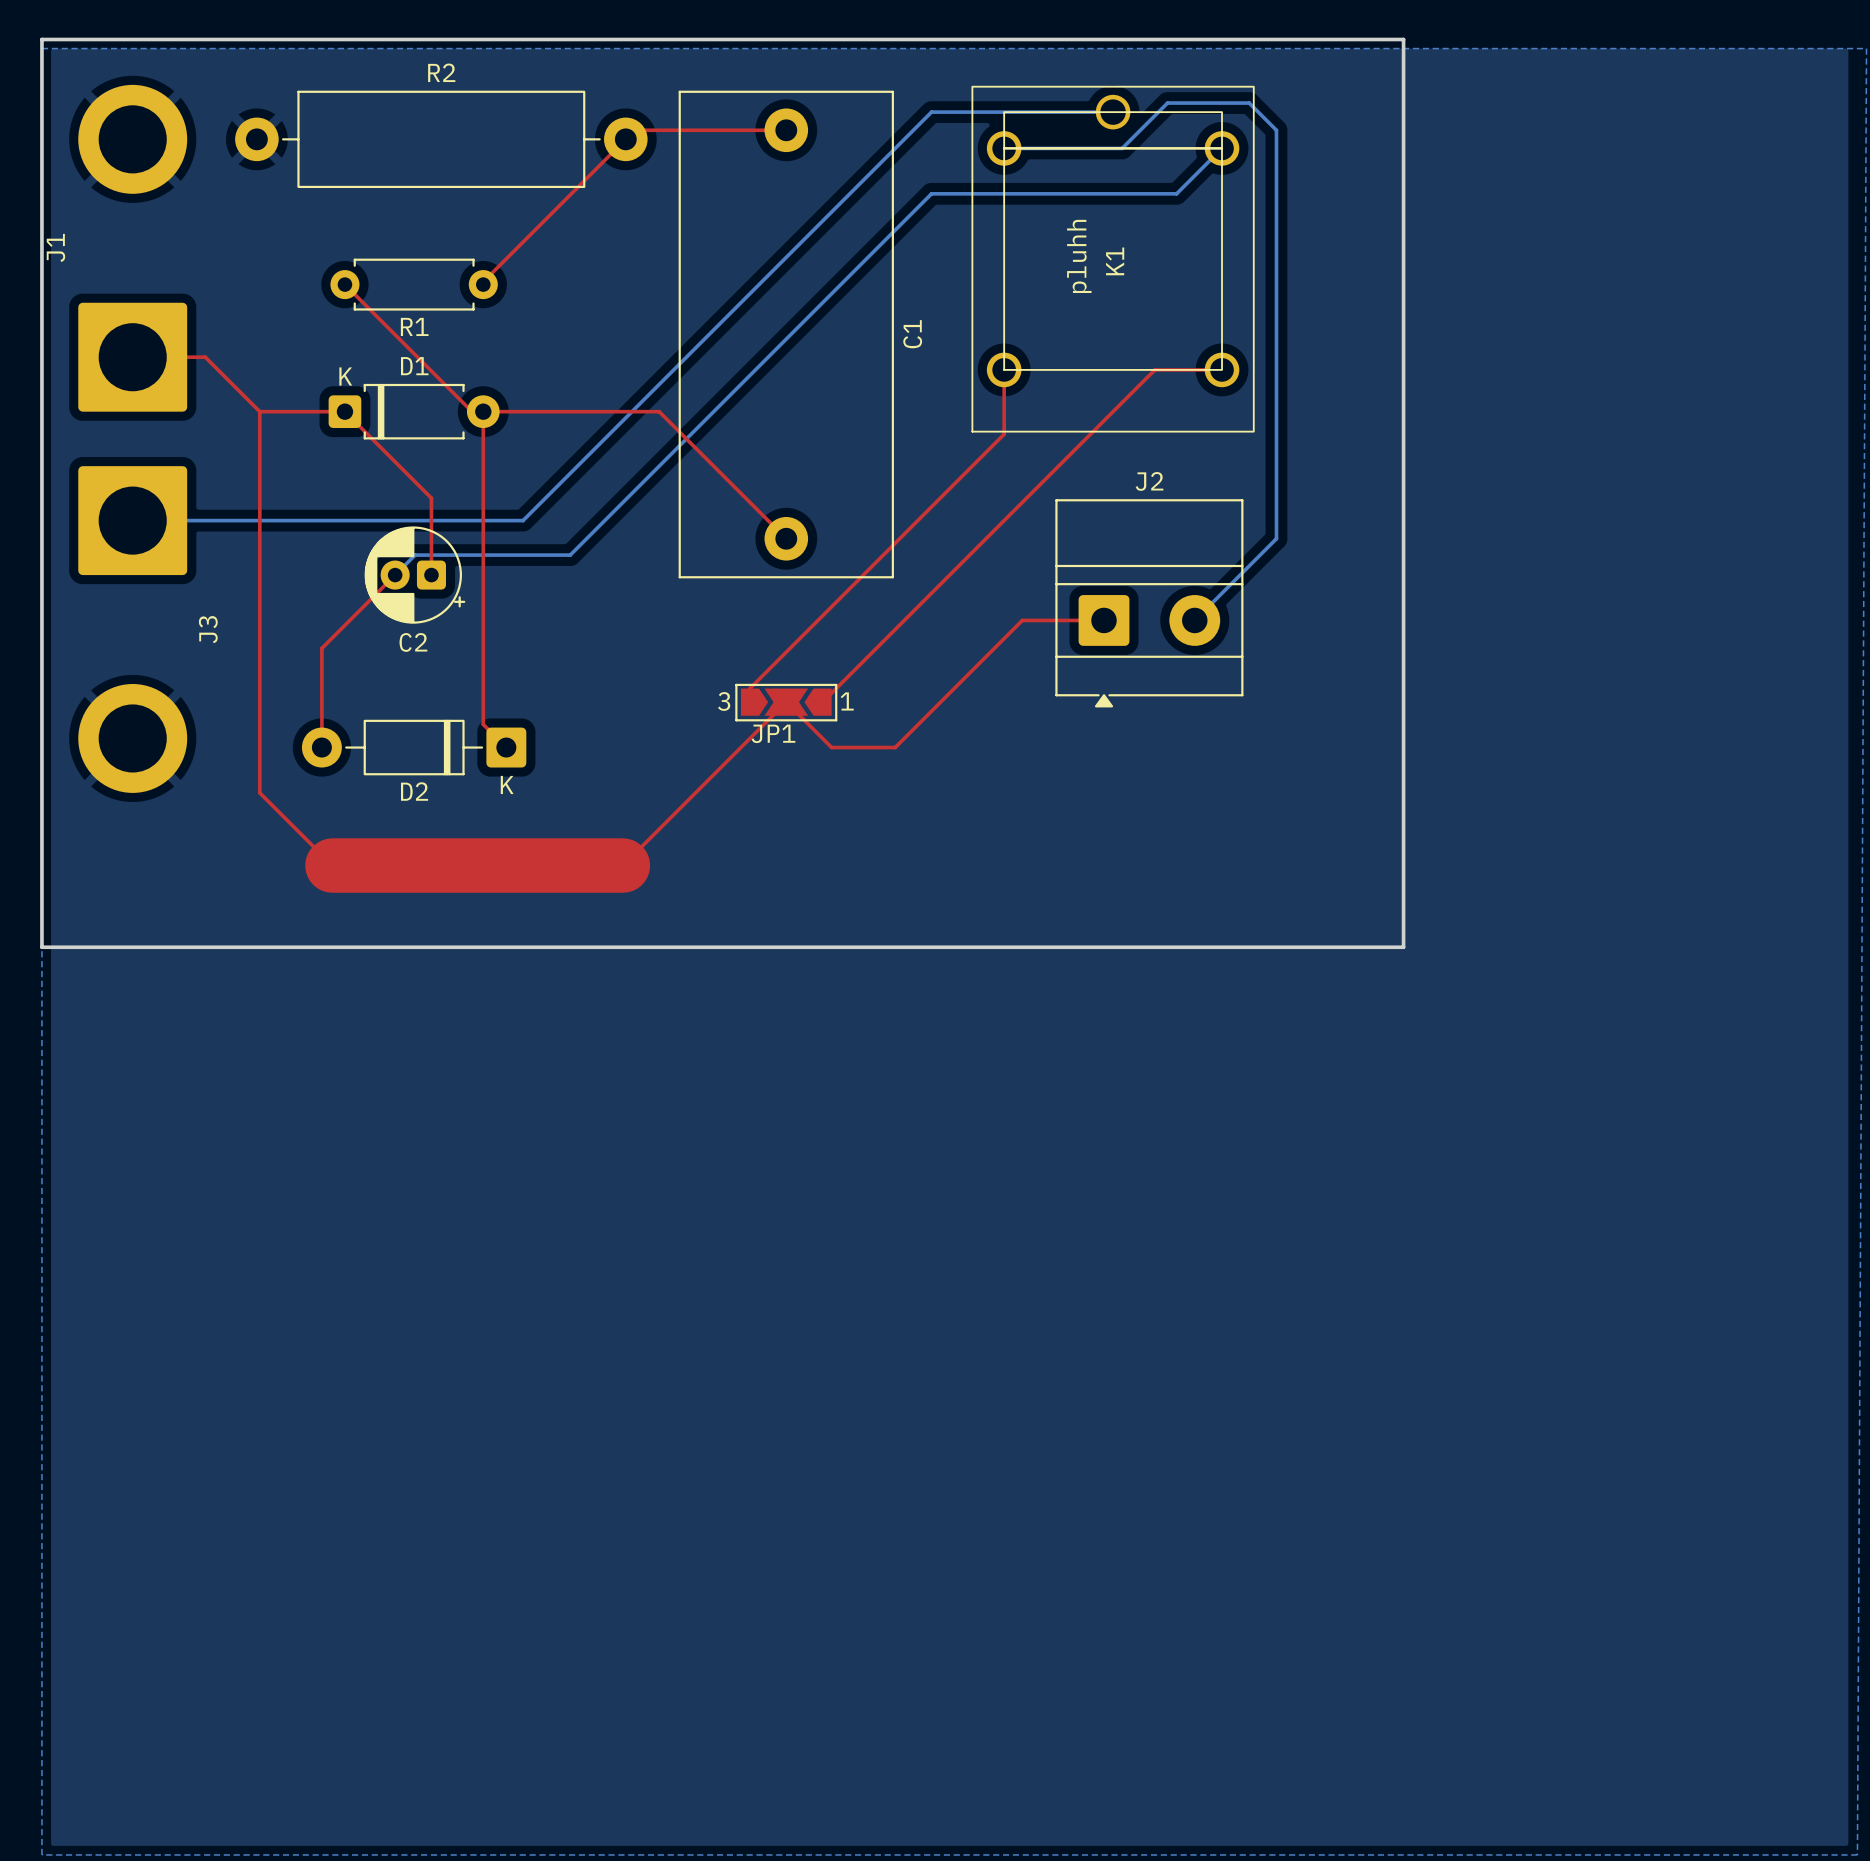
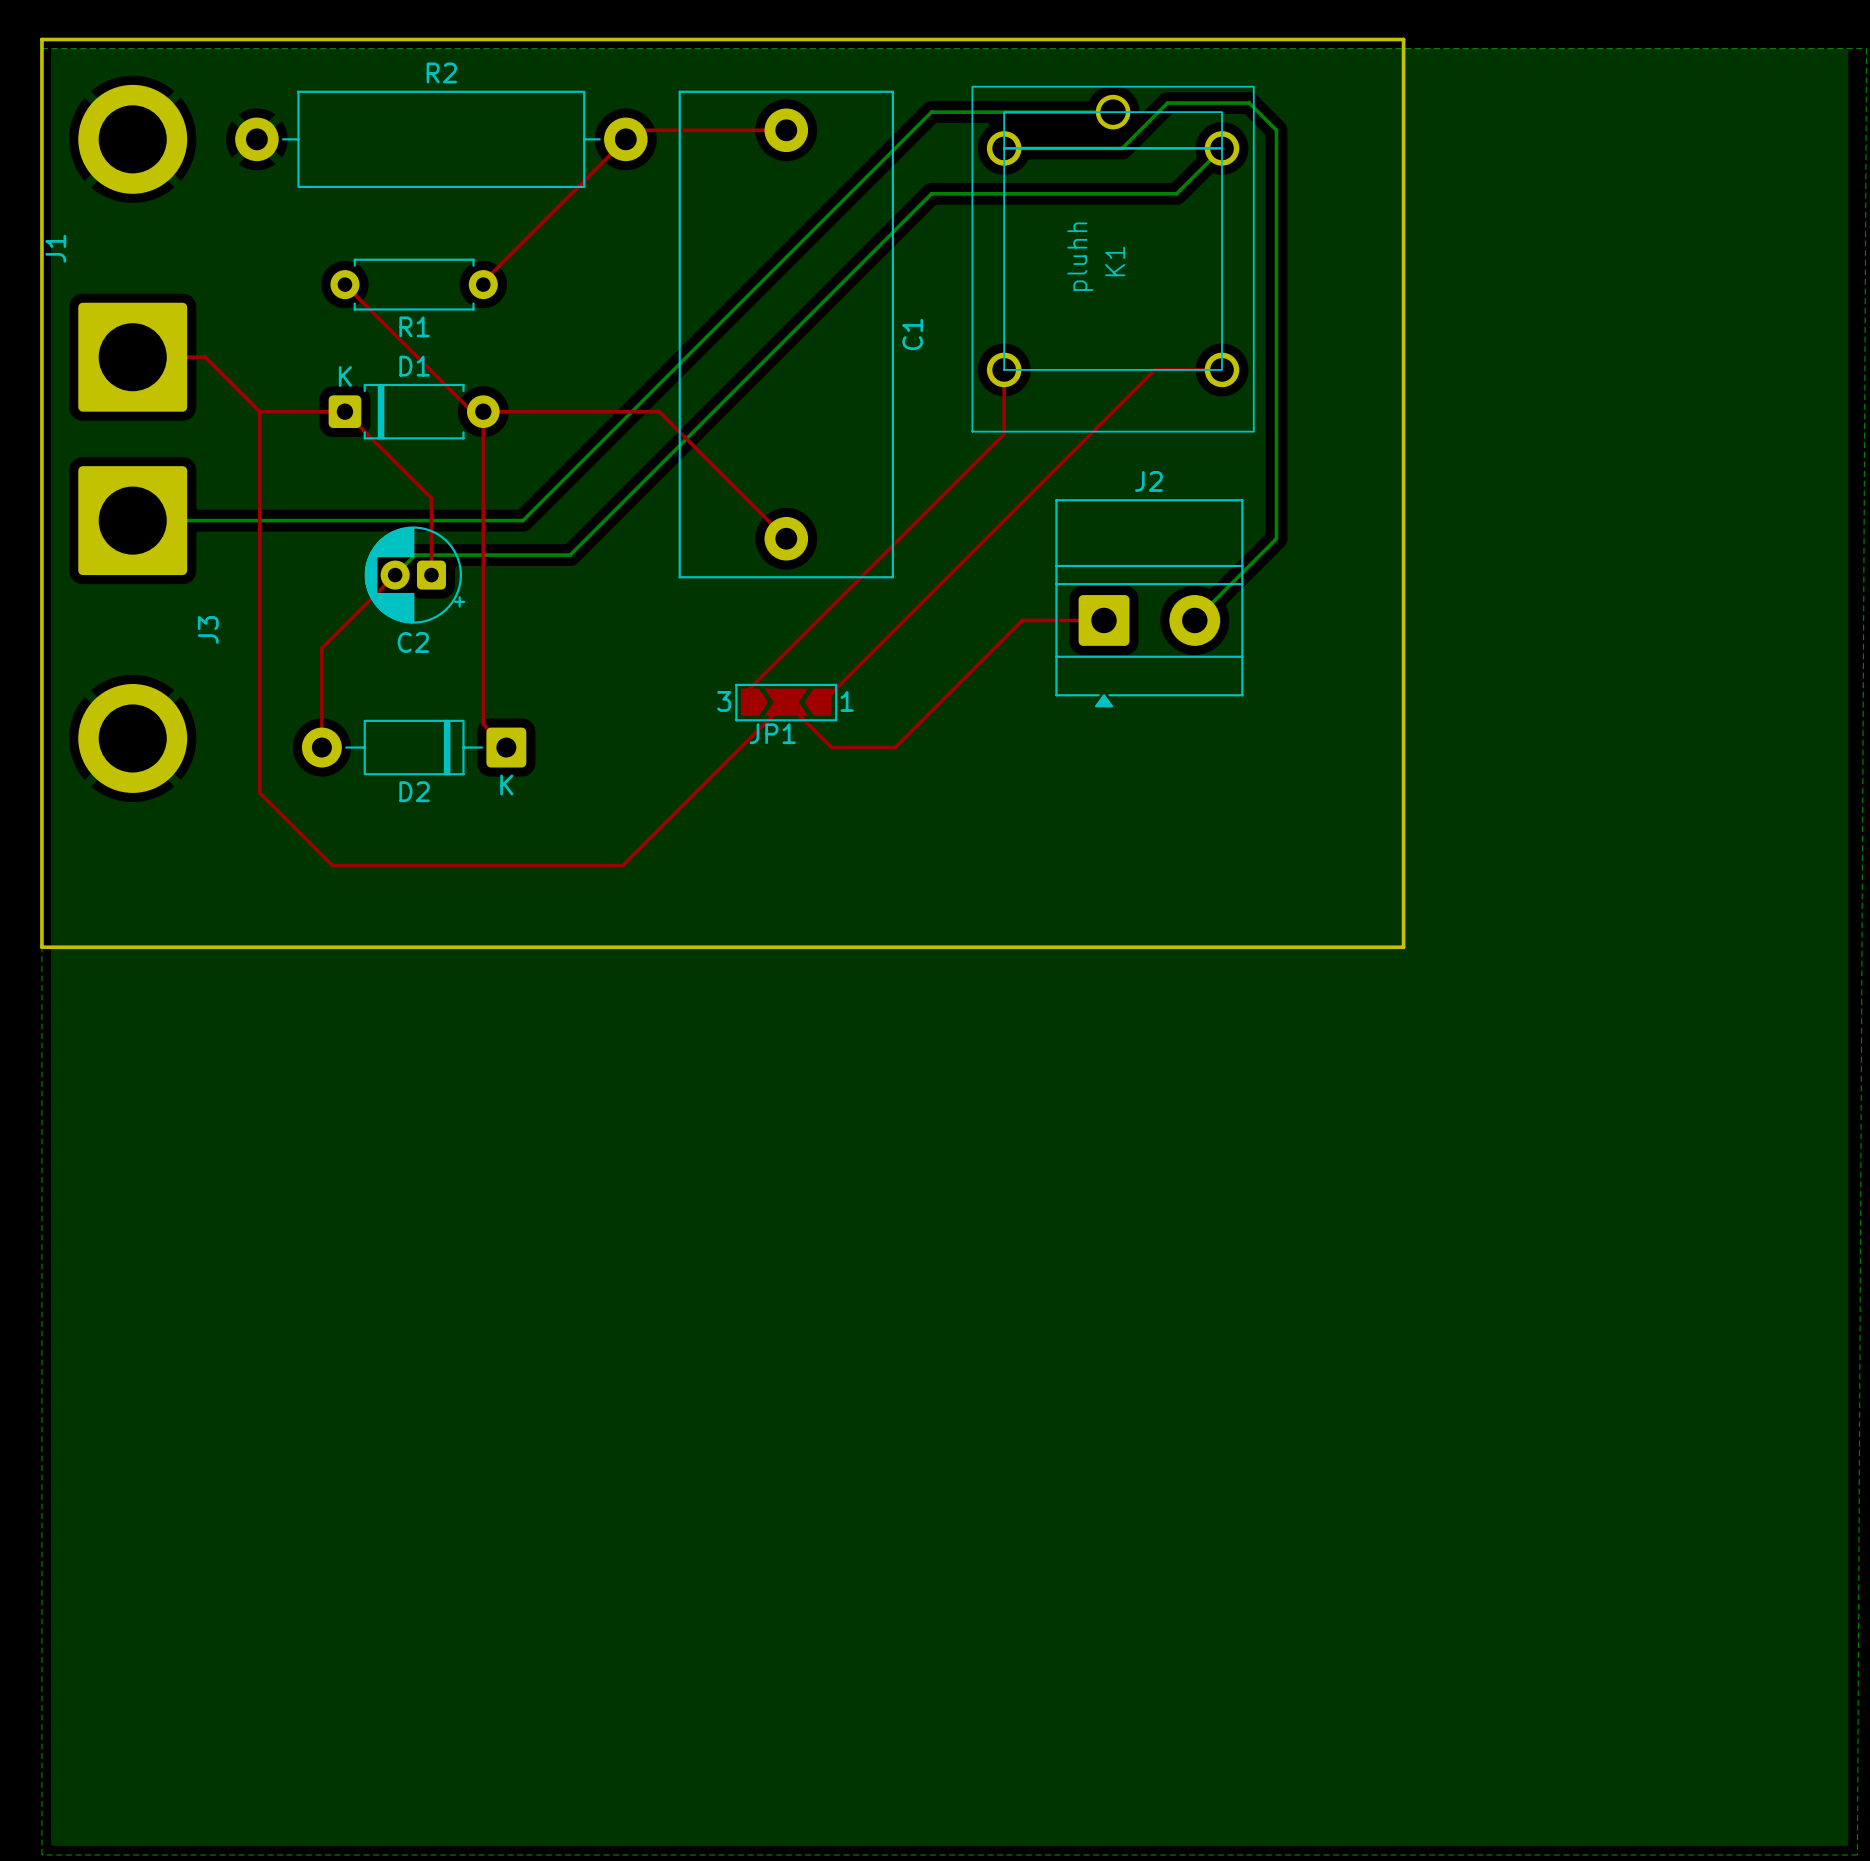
top track width: thick (332, 865) (622, 865) -> thin (332, 865) (622, 865)

